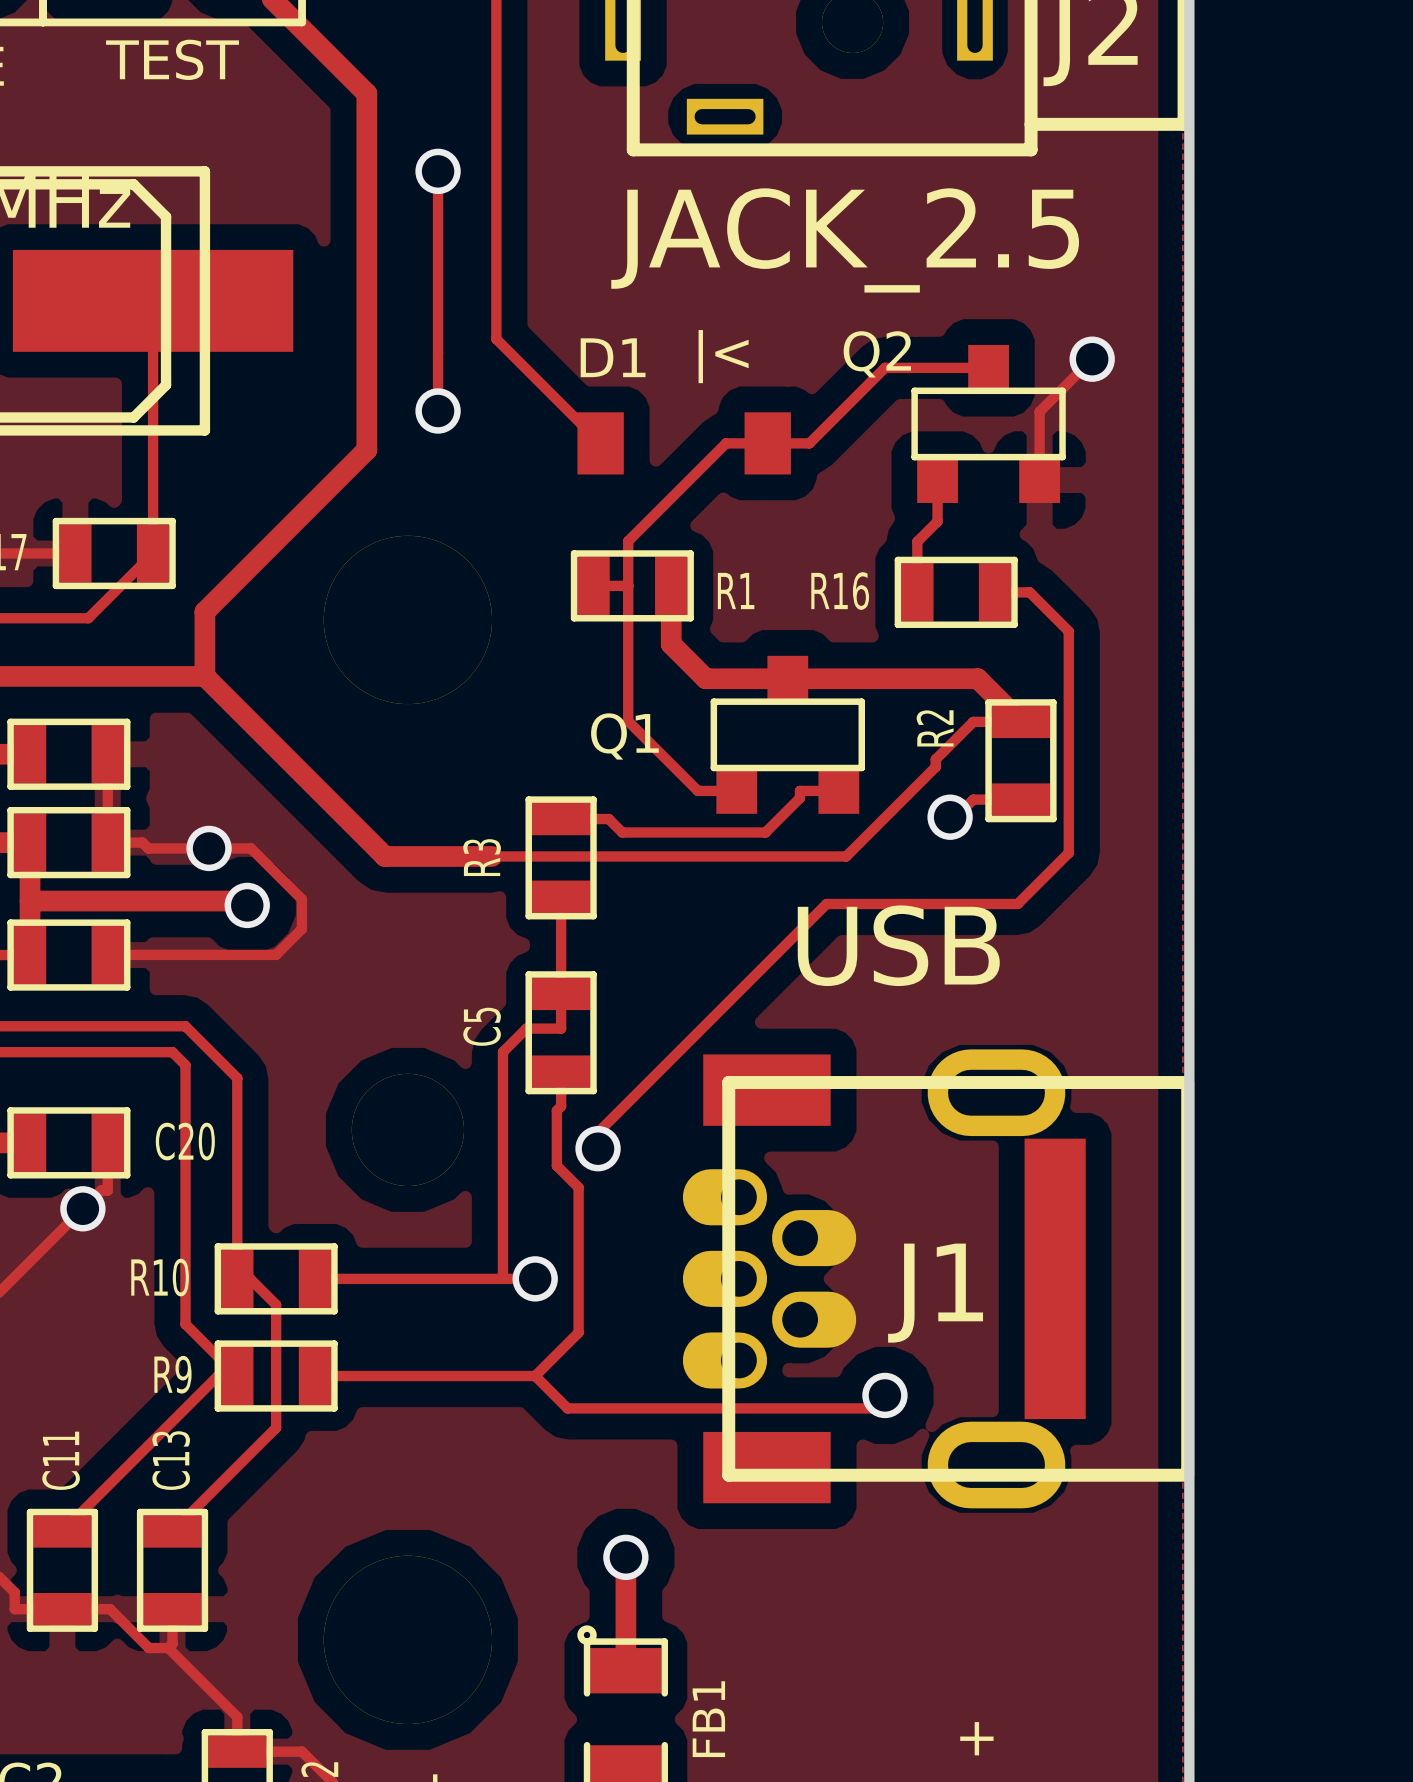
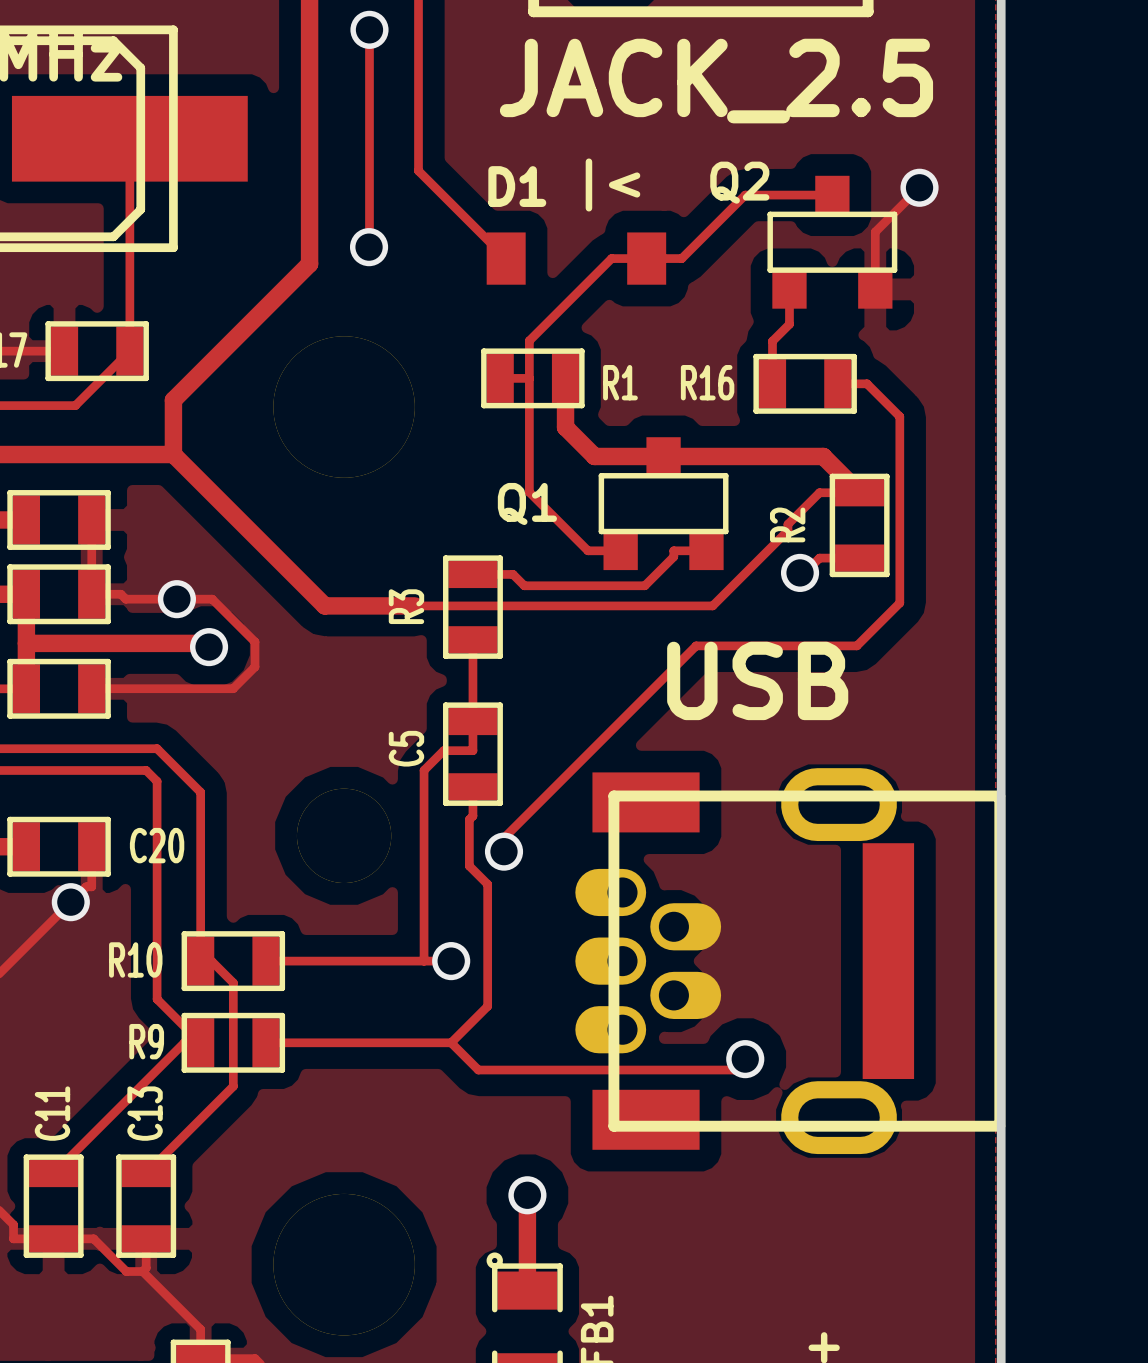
via position: (438, 411) -> (369, 247)
R2 name position: R2 (935, 728) -> R2 (787, 524)
J1 name: J1 (935, 1293) -> none

